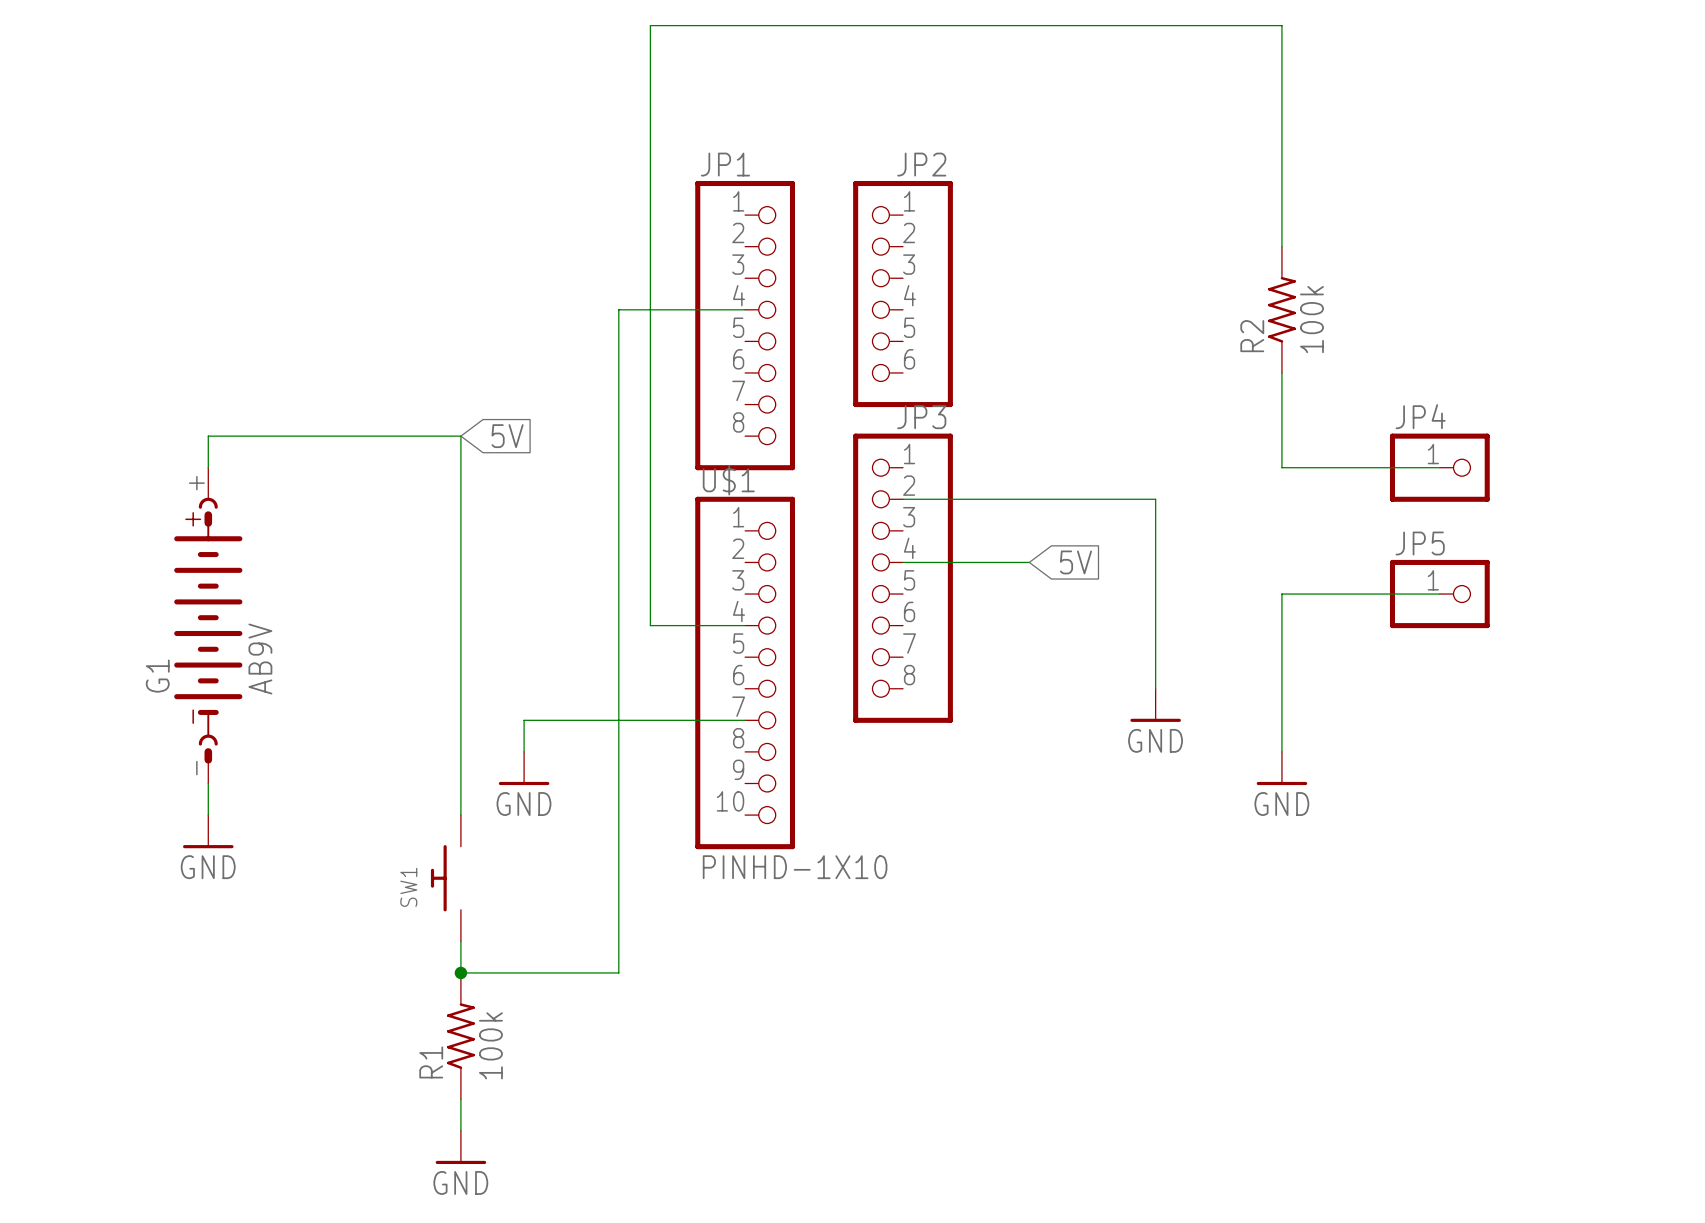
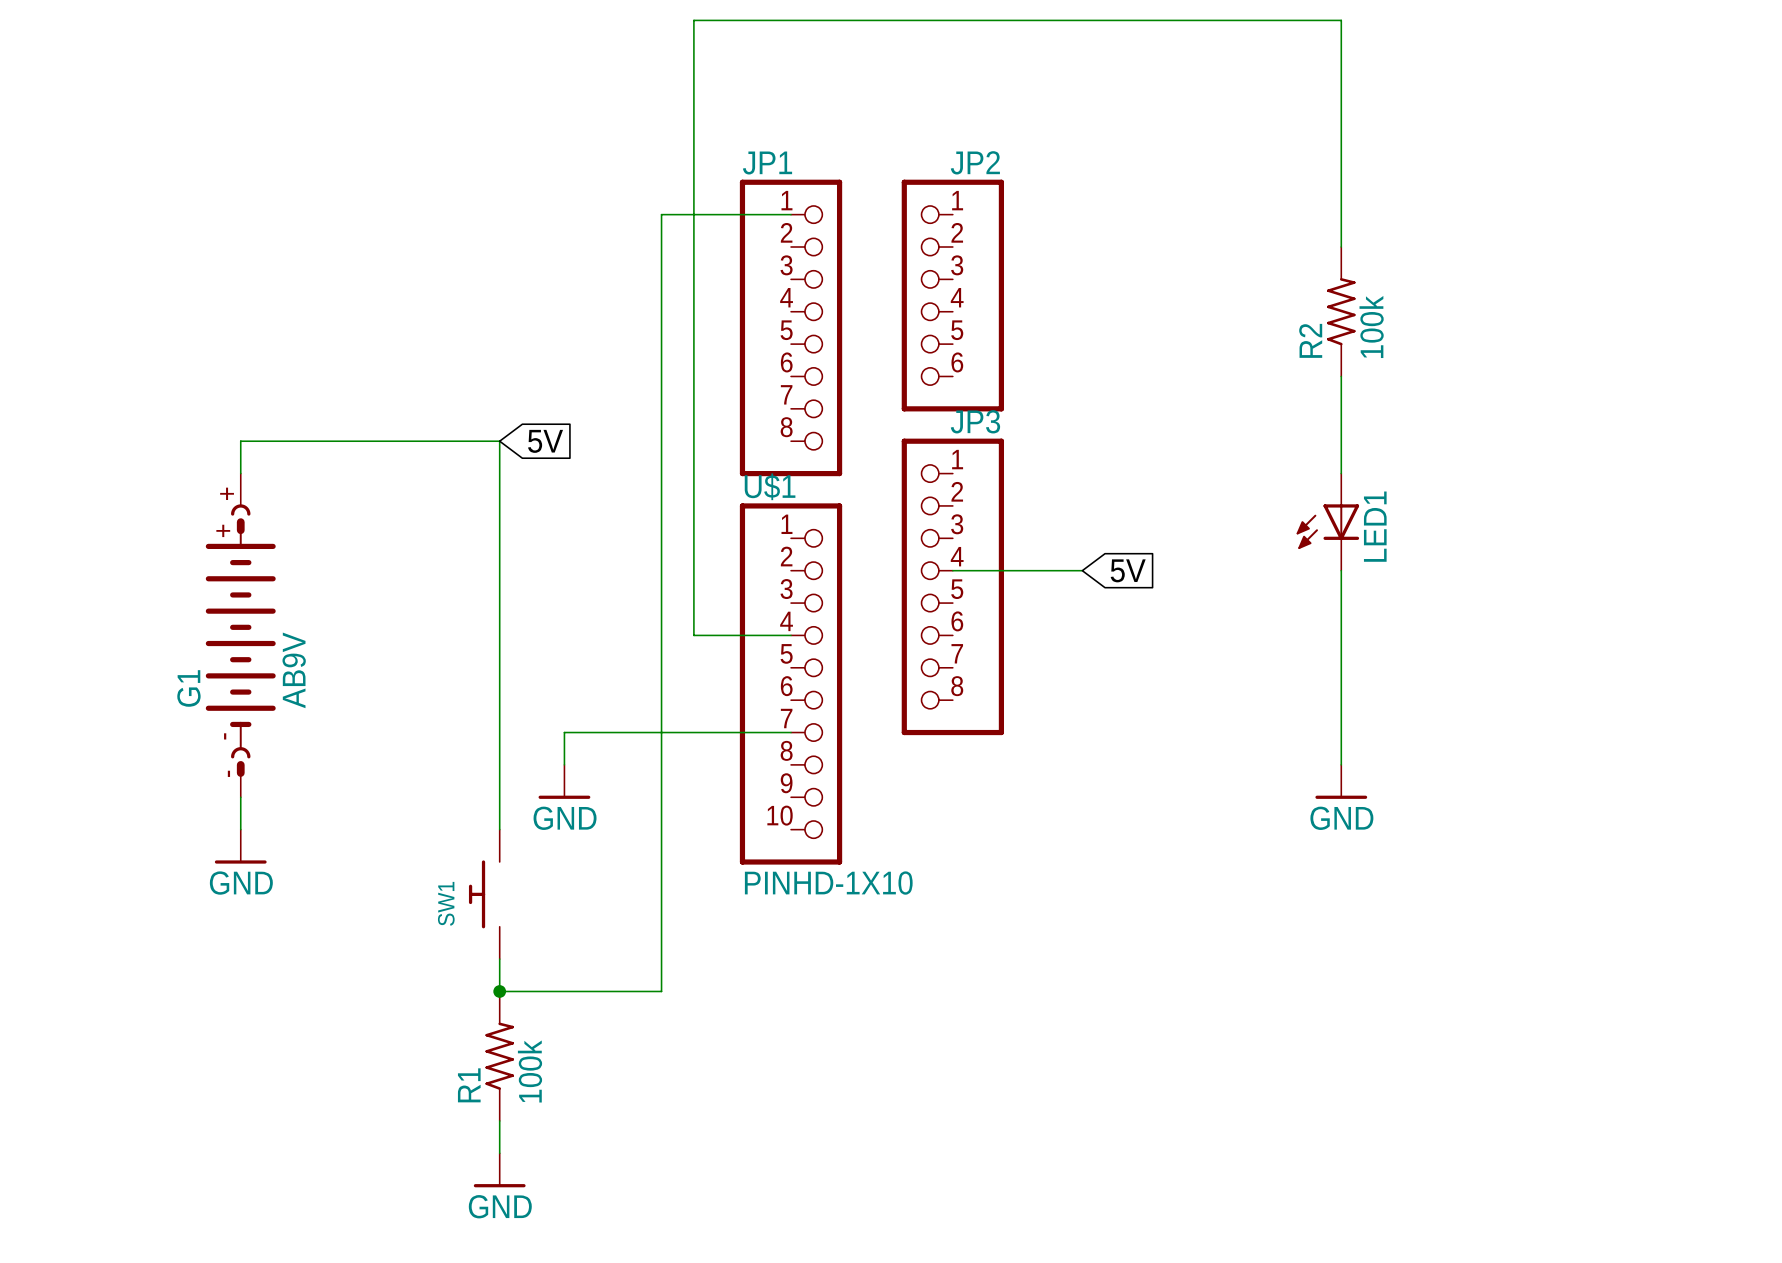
wire: (618, 309) (745, 309) -> (661, 311) (661, 214) (791, 214)
wire: (1281, 467) (1439, 467) -> none
JP4: (1439, 467) -> none
wire: (903, 499) (1155, 499) (1155, 688) -> none
LED1: none -> (1327, 522)
wire: (1281, 594) (1439, 594) -> (1341, 603) (1341, 570)
JP5: (1439, 594) -> none
power symbol: GND (1155, 705) -> none

